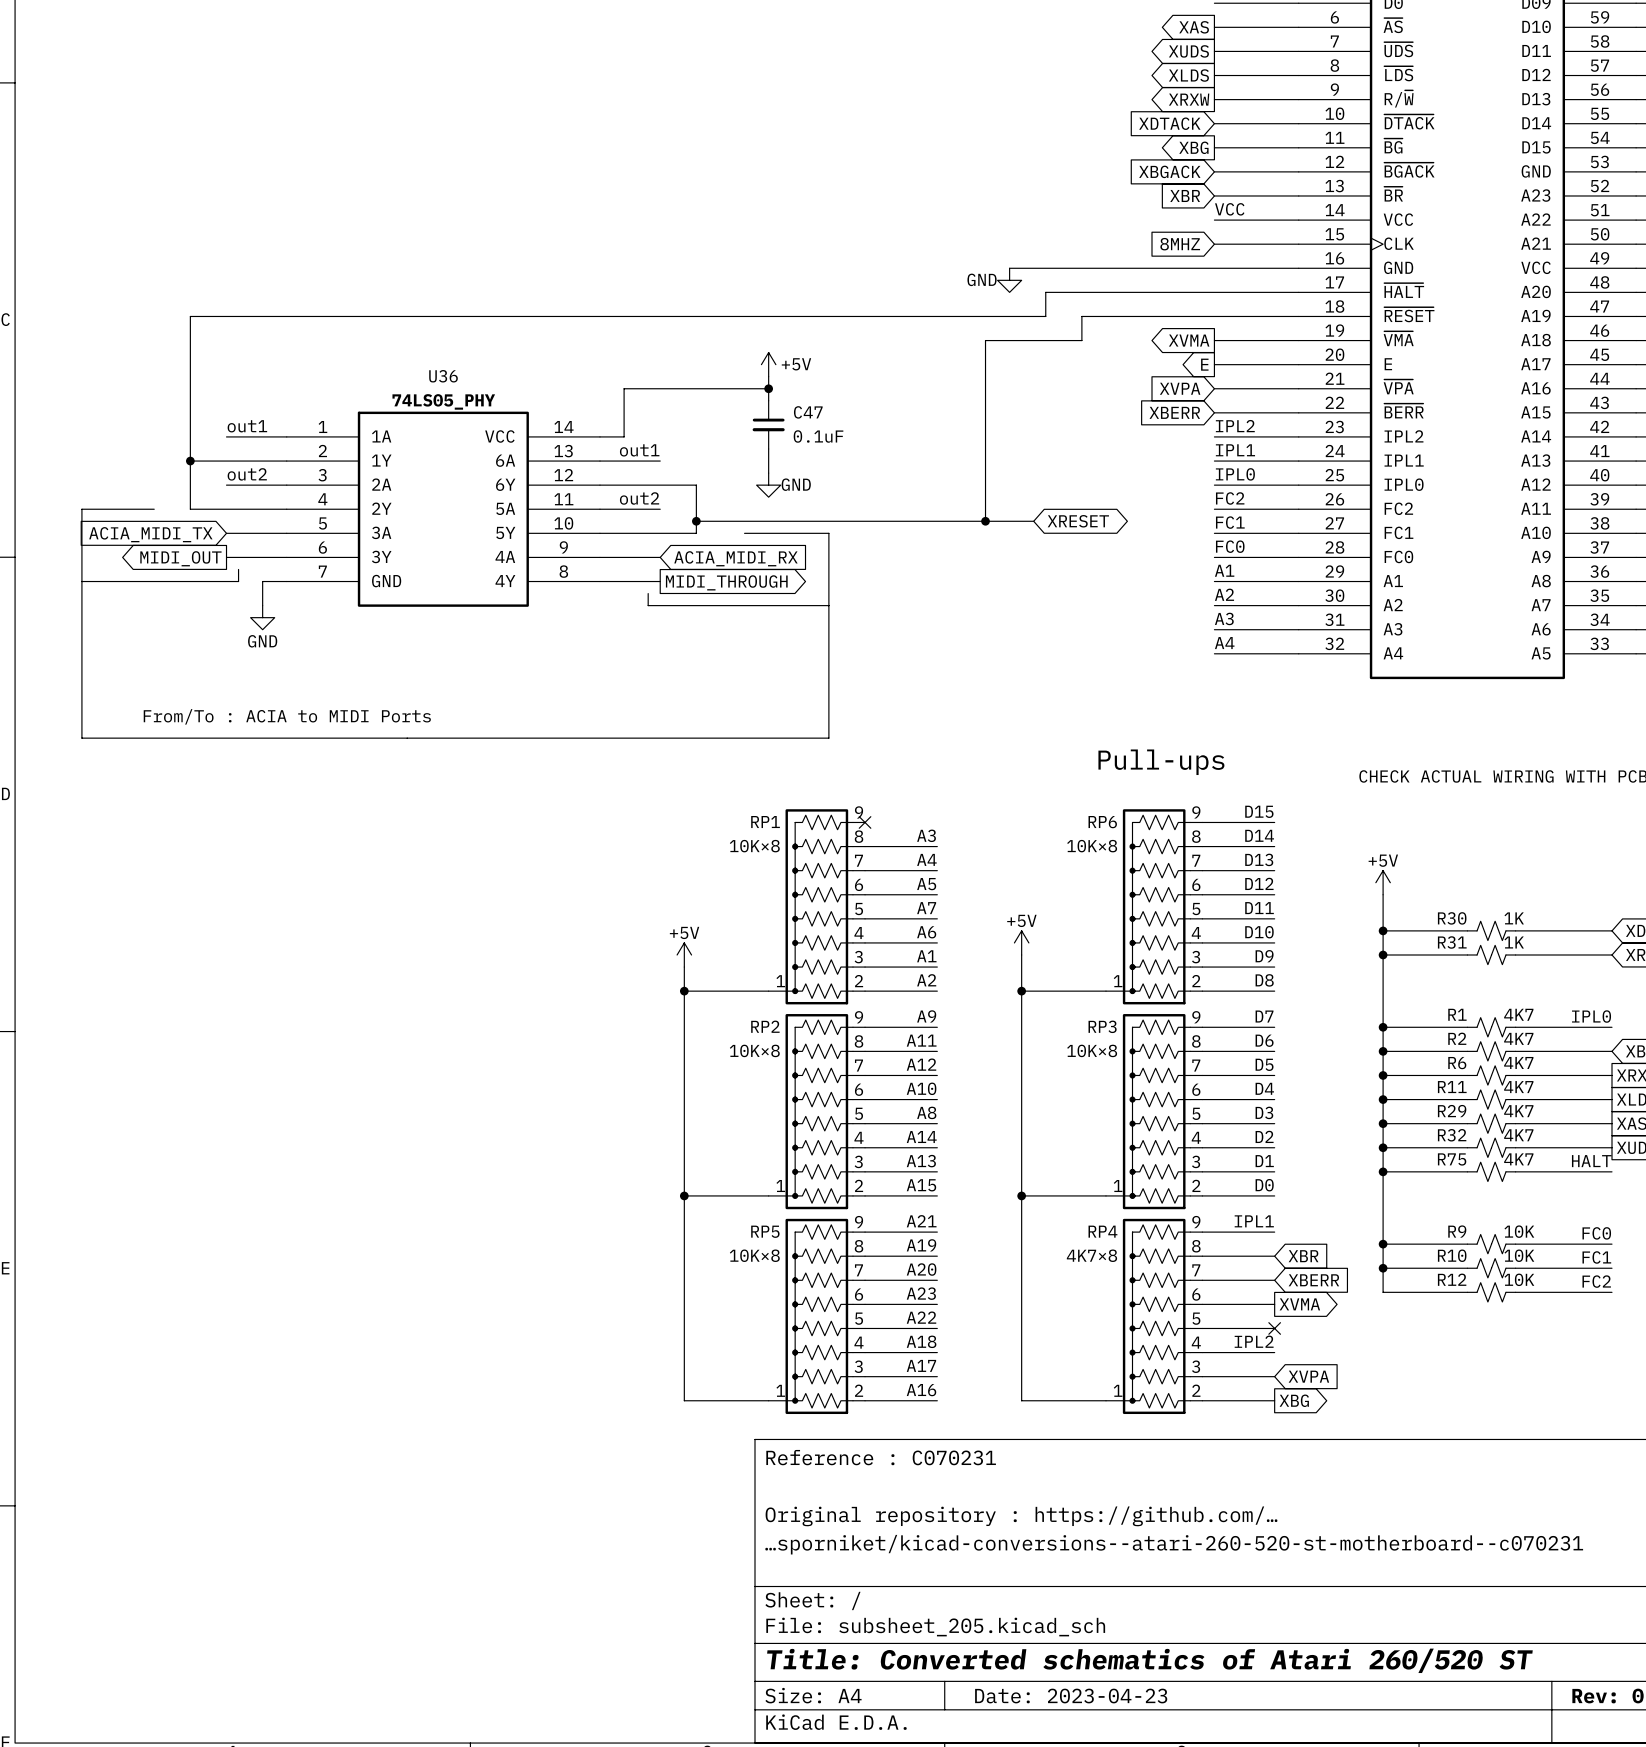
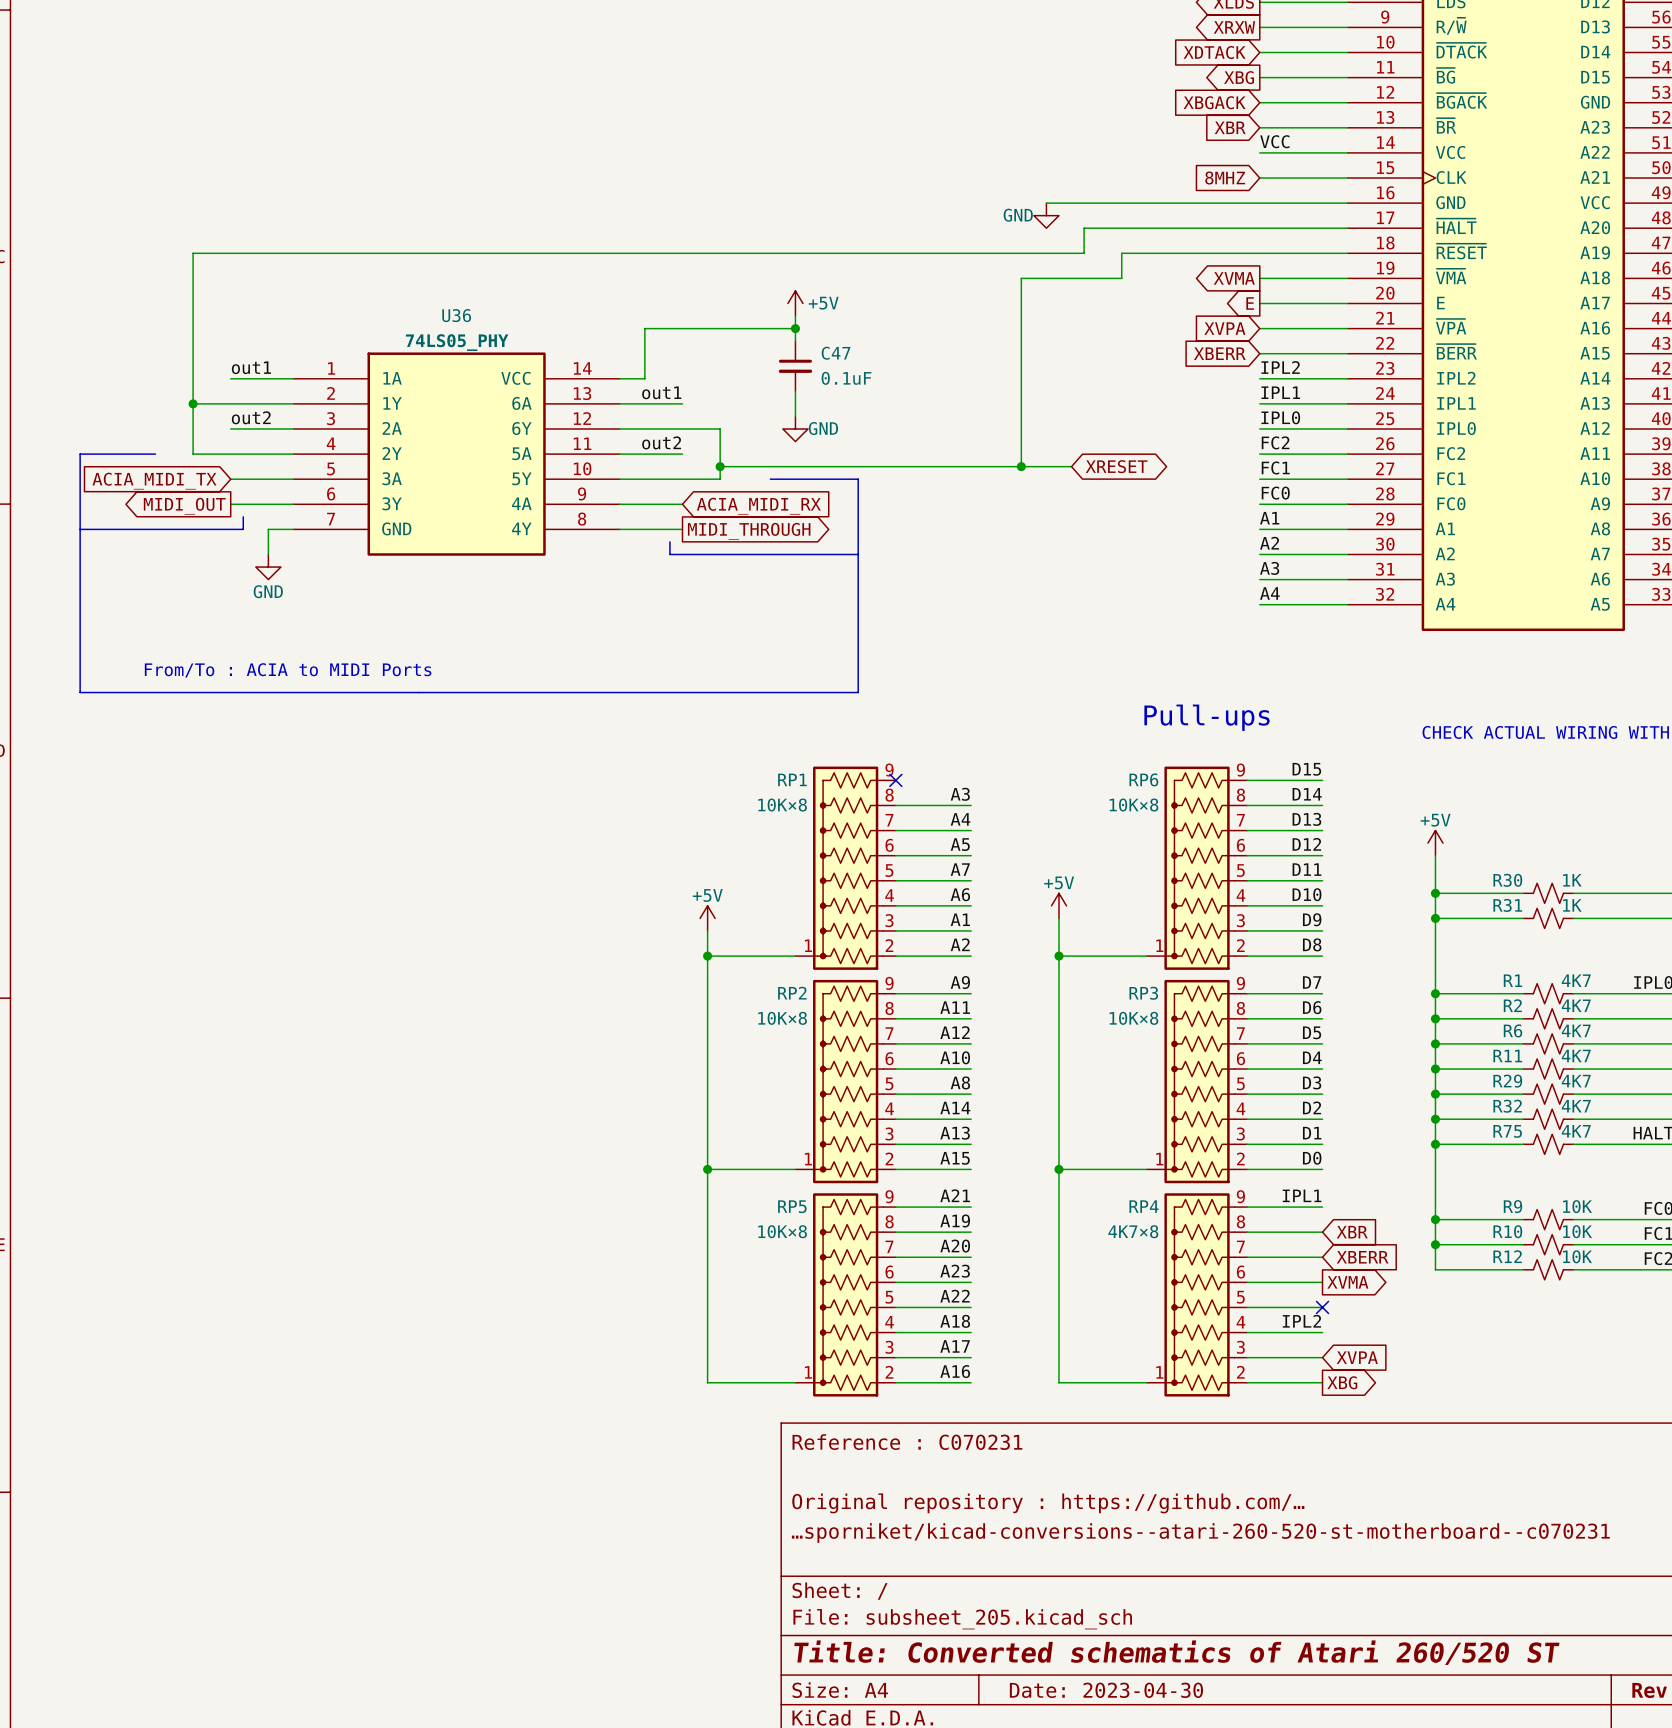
title block: Date: 2023-04-23 (1071, 1696) -> Date: 2023-04-30 (1106, 1690)

